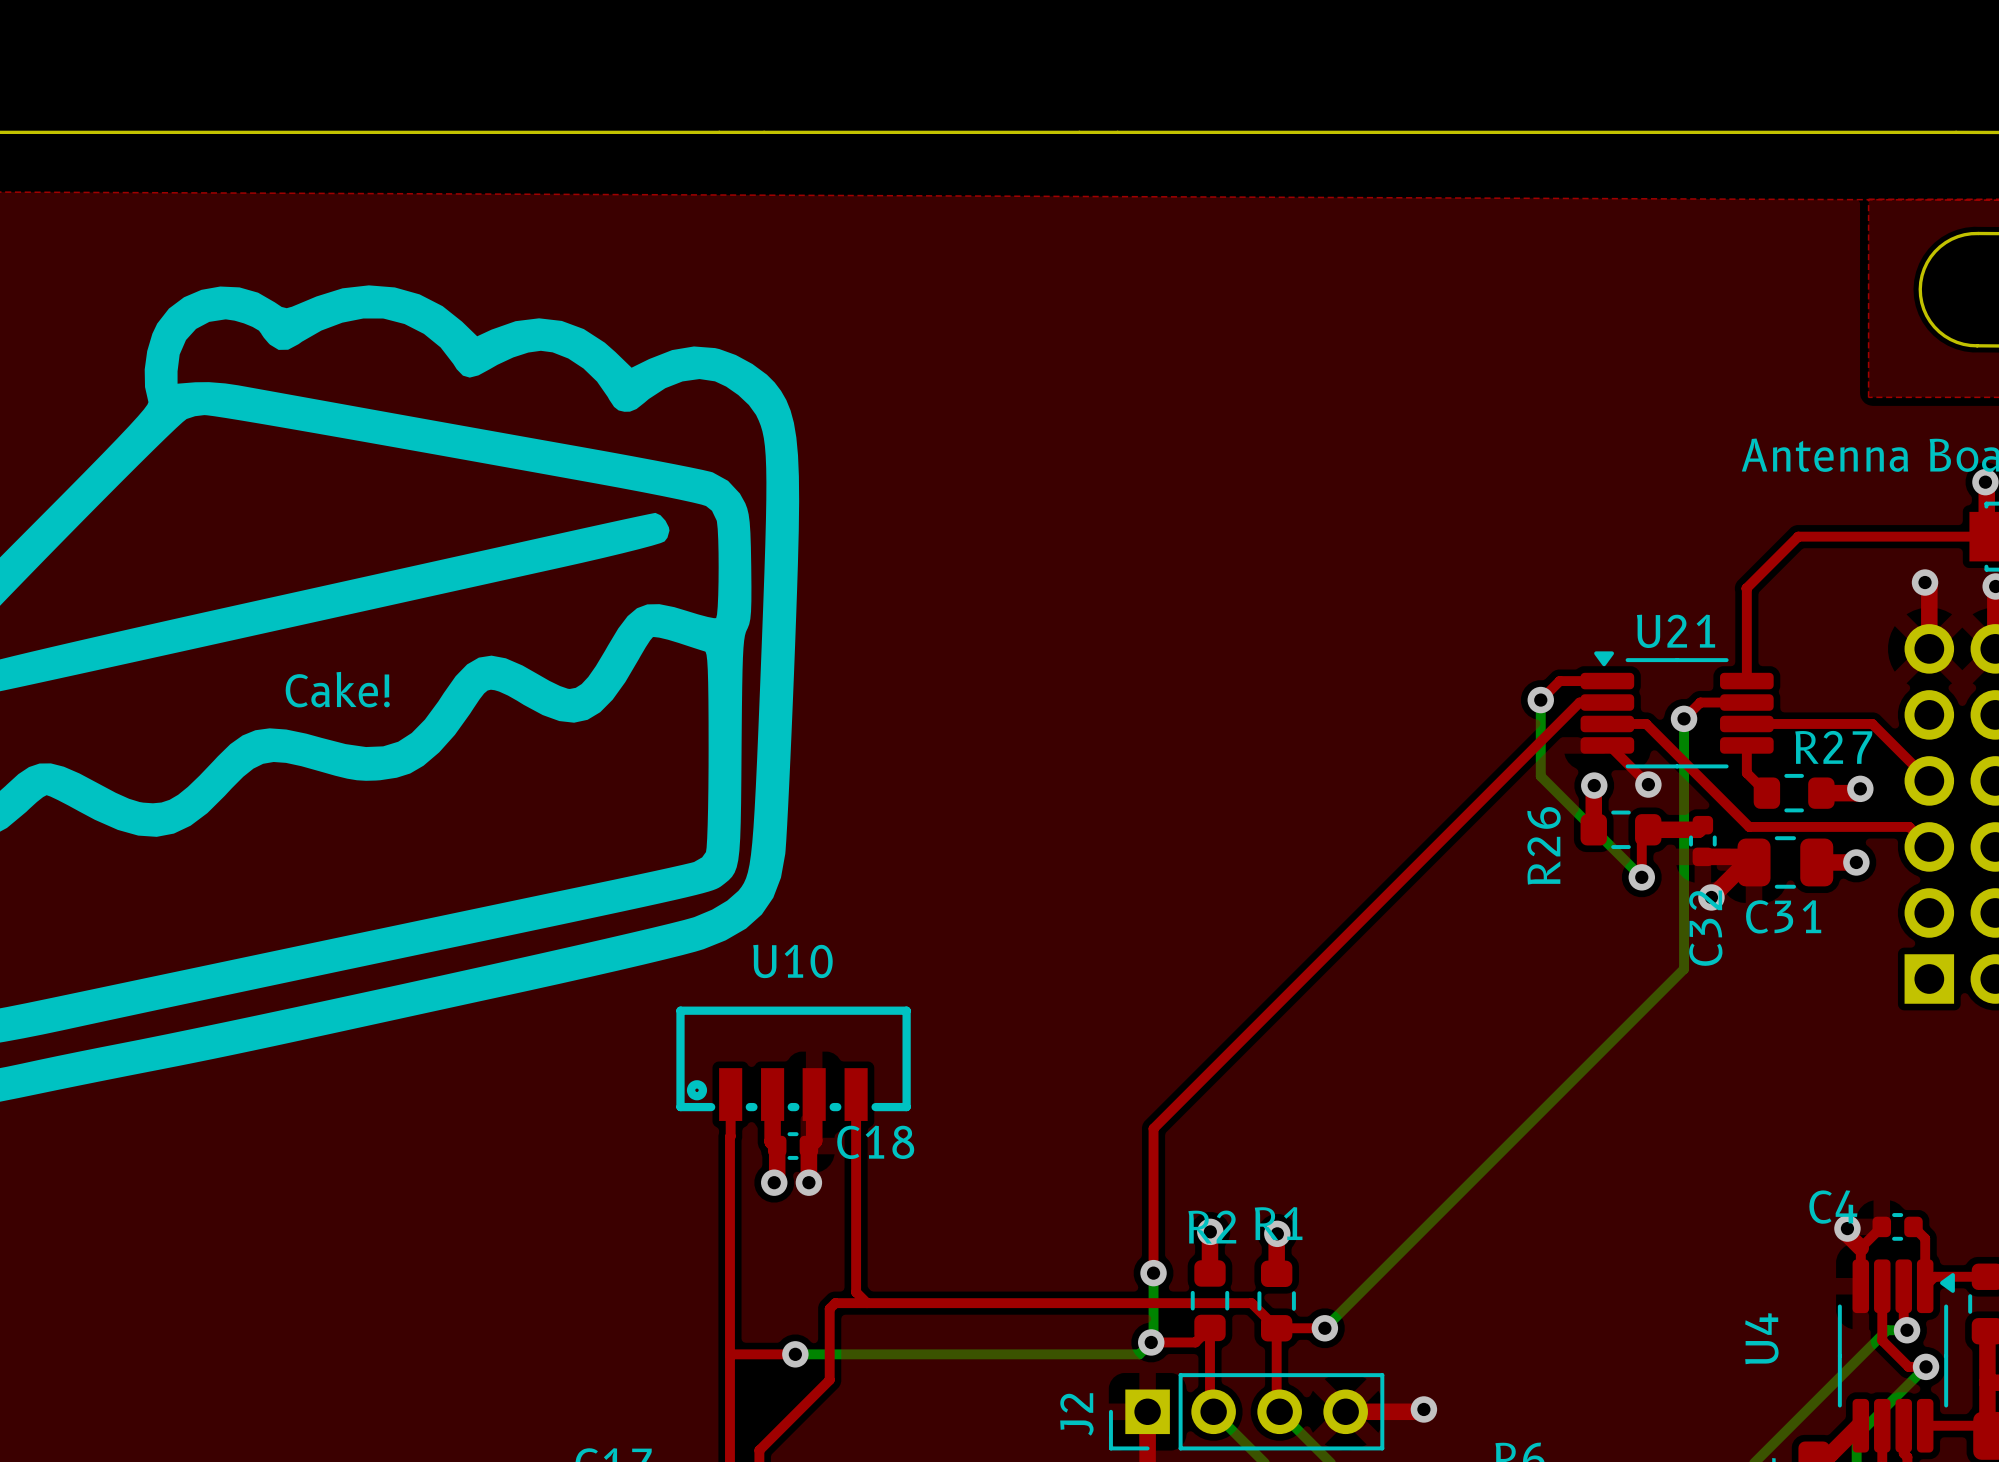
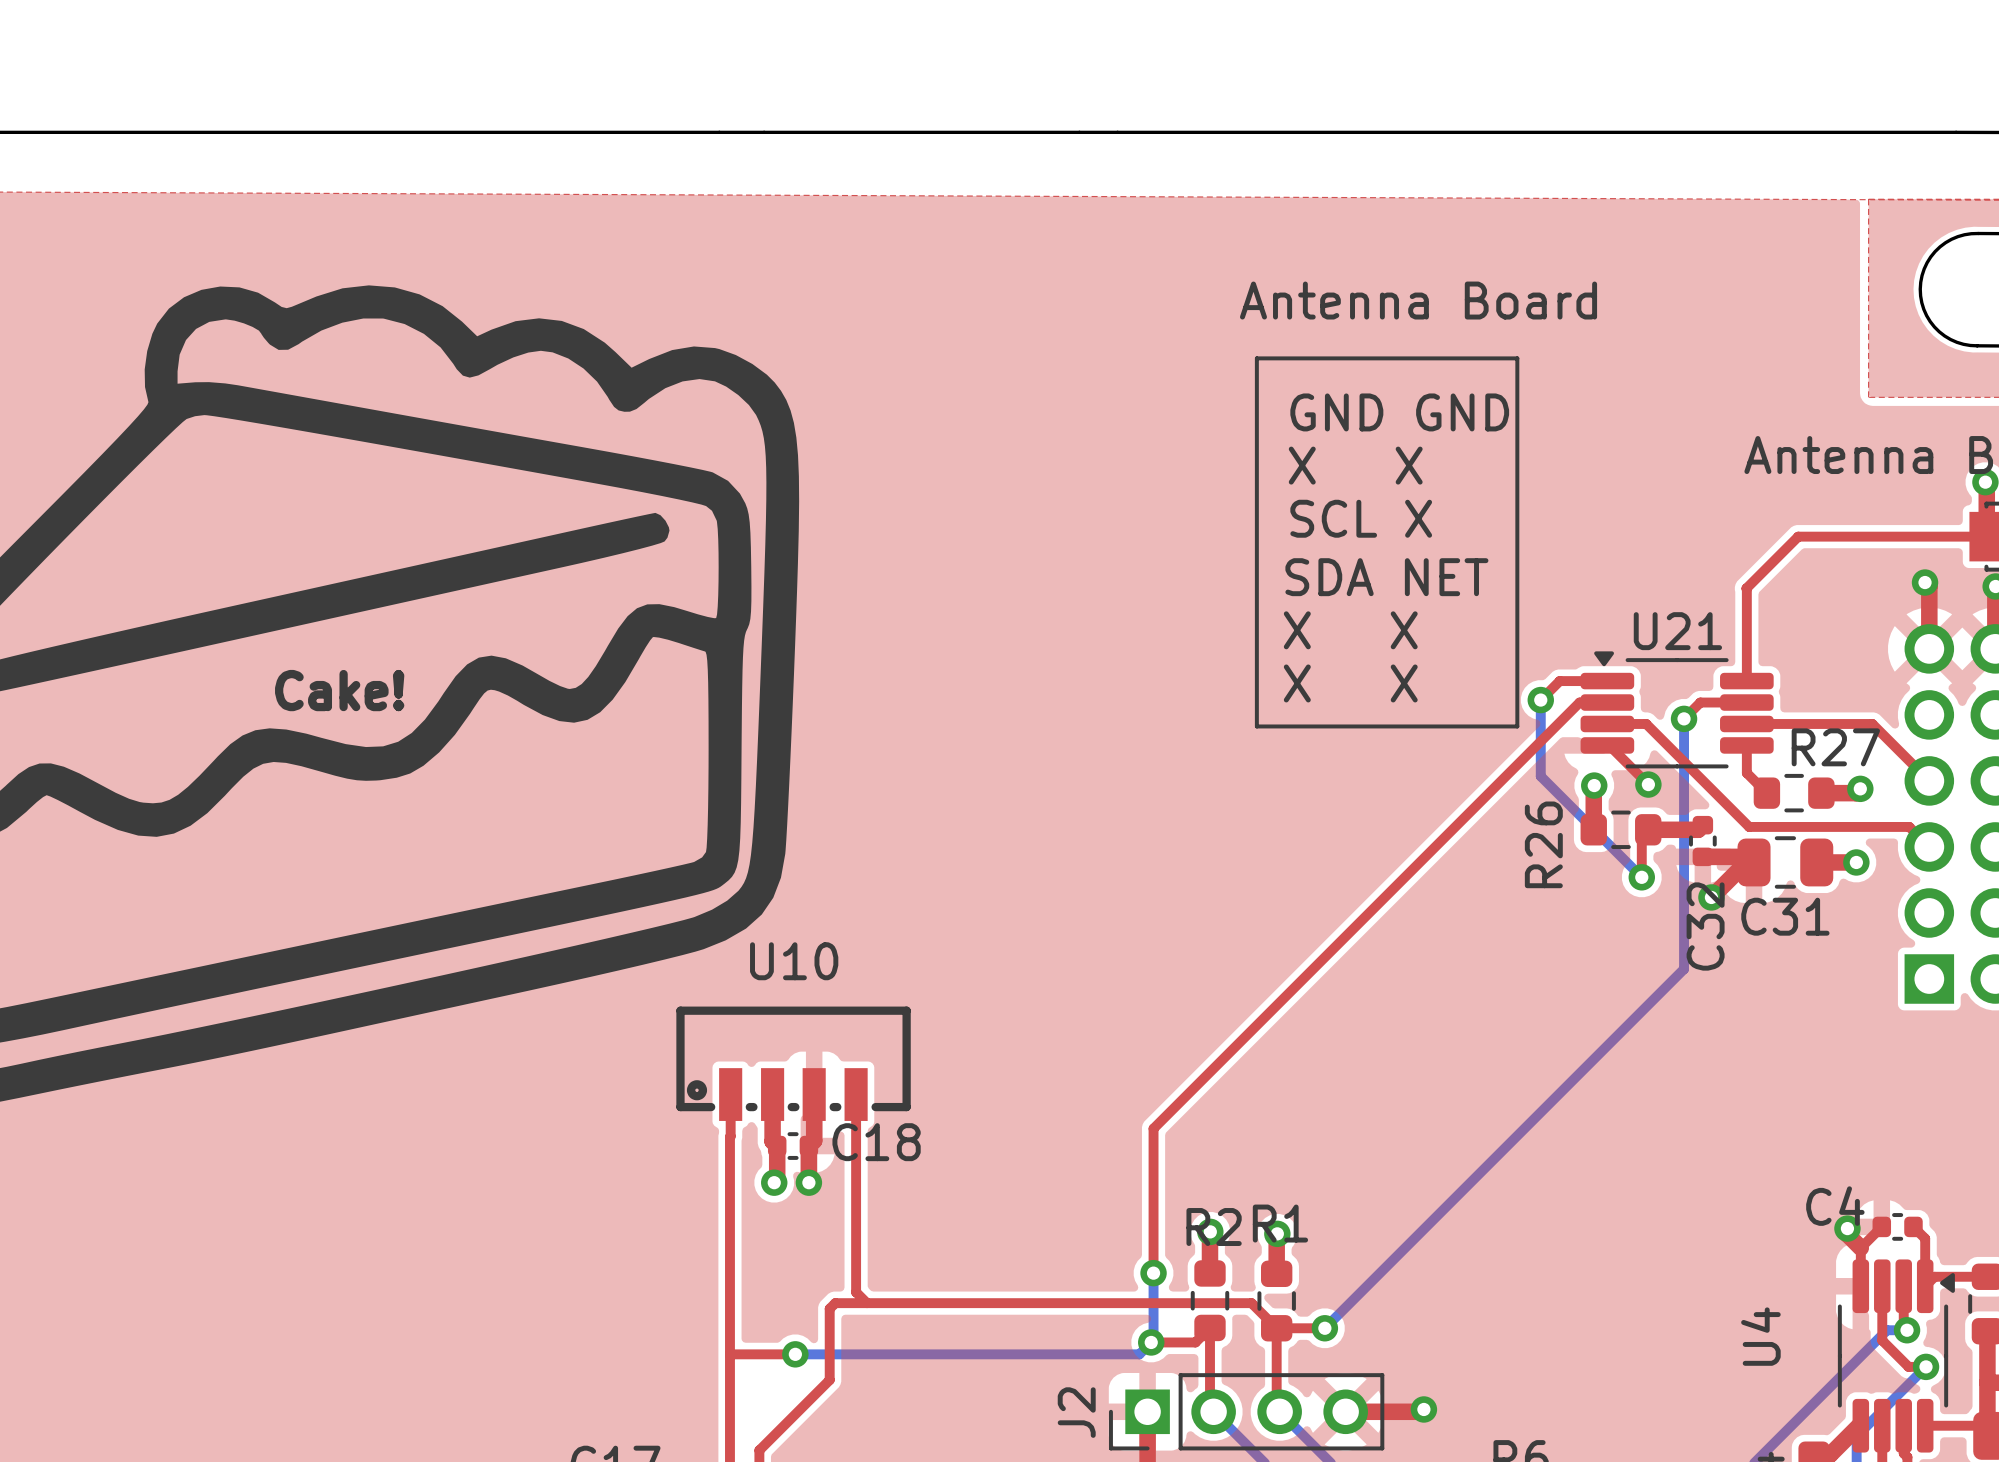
text: none -> Antenna Board (1418, 300)
line: none -> (1256, 358) (1517, 358) (1517, 726) (1256, 726) (1256, 358)
text: none -> GND GND (1399, 412)
text: none -> X X (1355, 465)
text: none -> SCL X (1361, 518)
text: none -> SDA NET (1386, 577)
text: none -> X X (1350, 630)
text: none -> X X (1350, 683)

